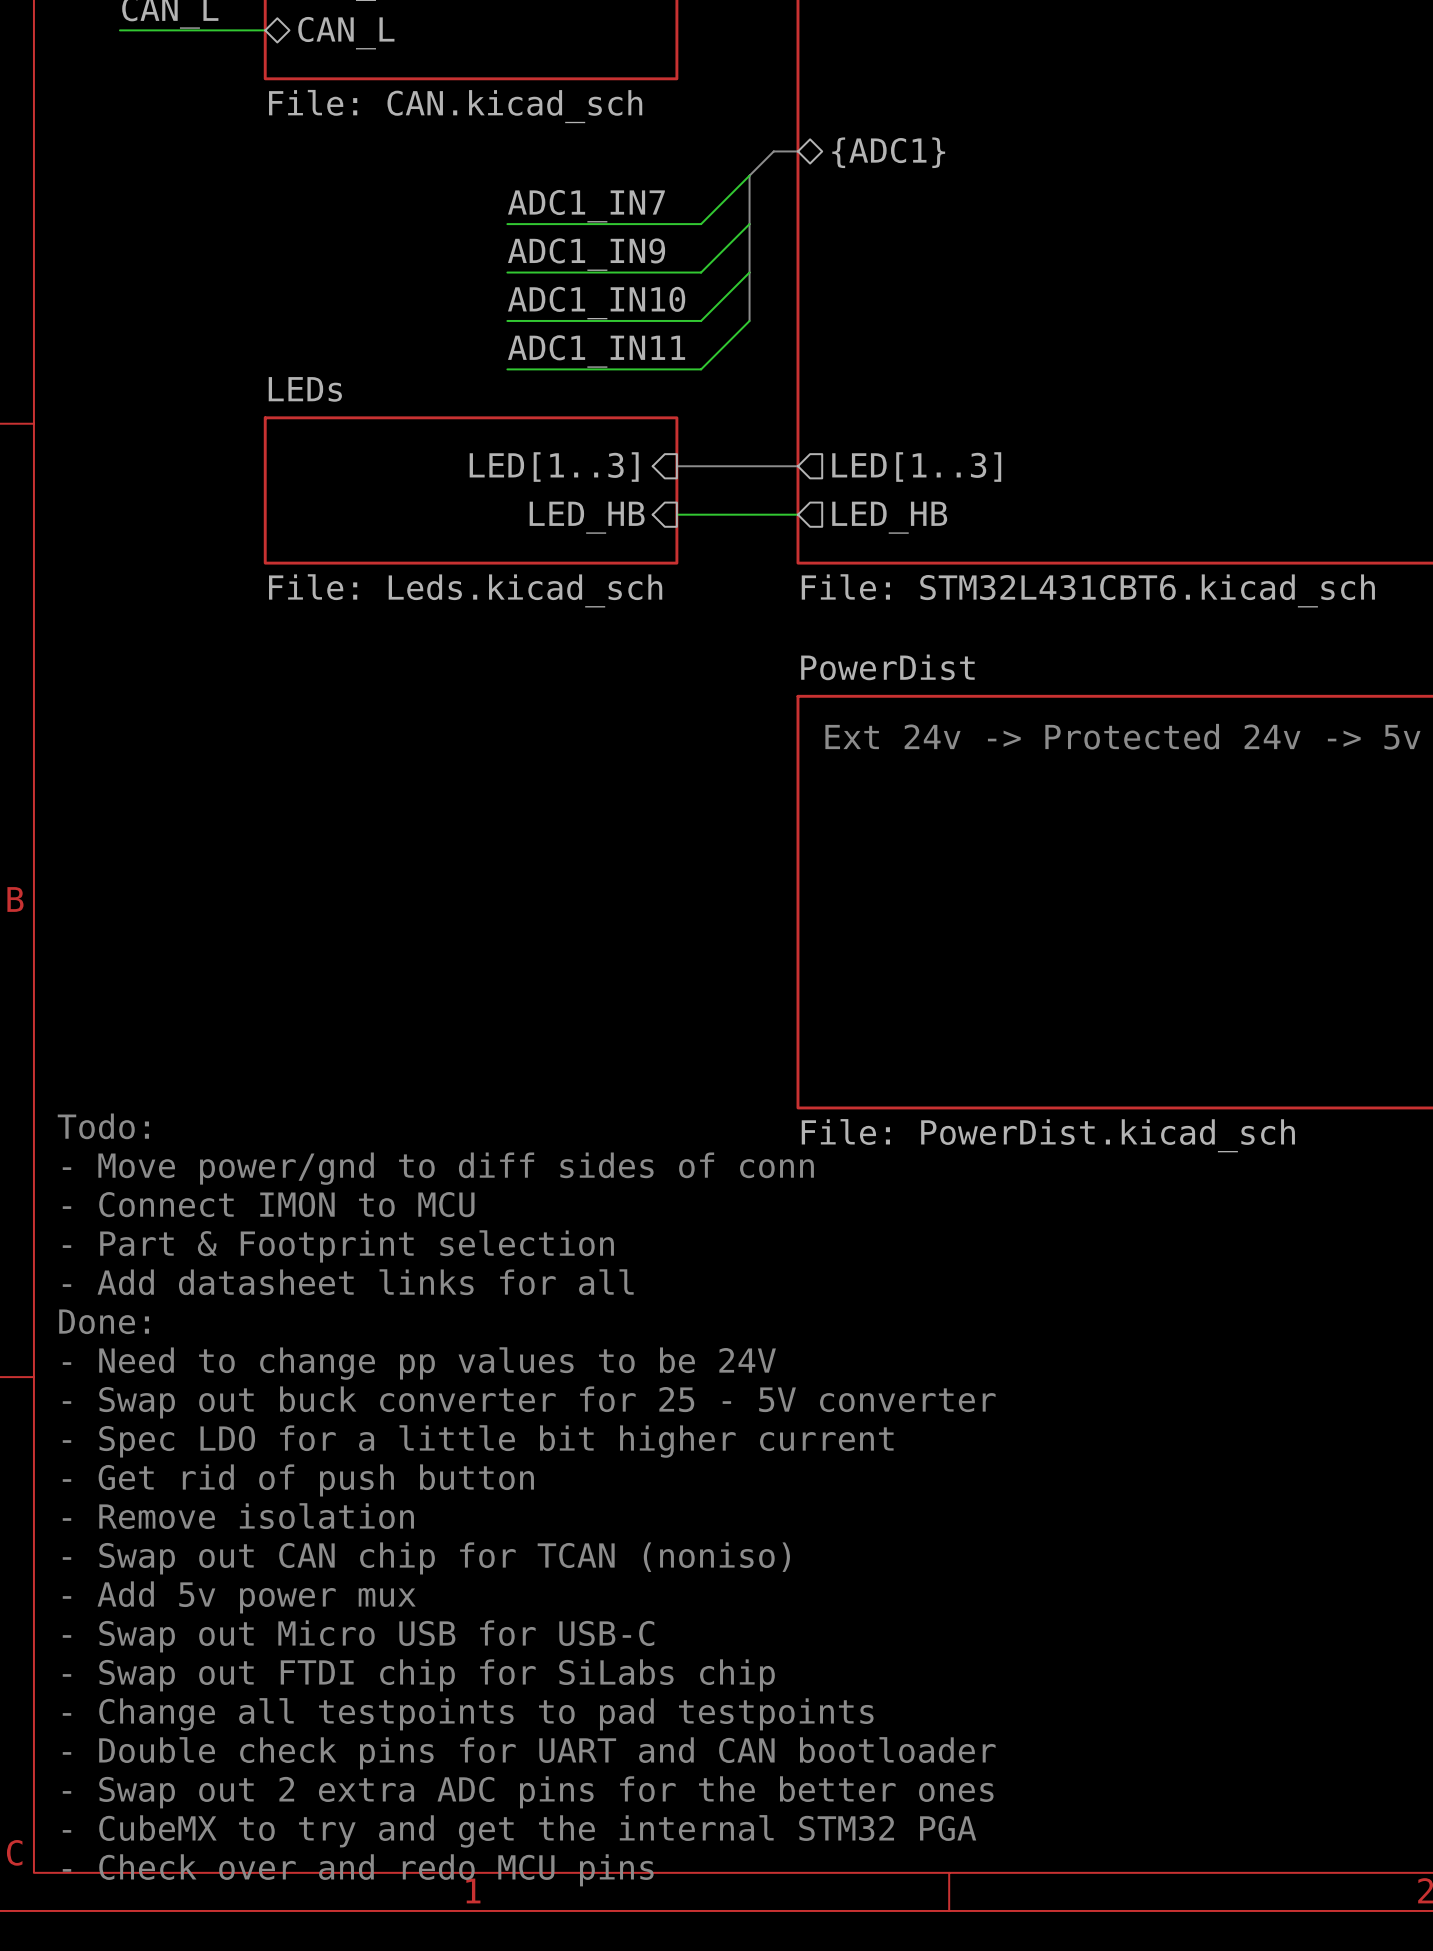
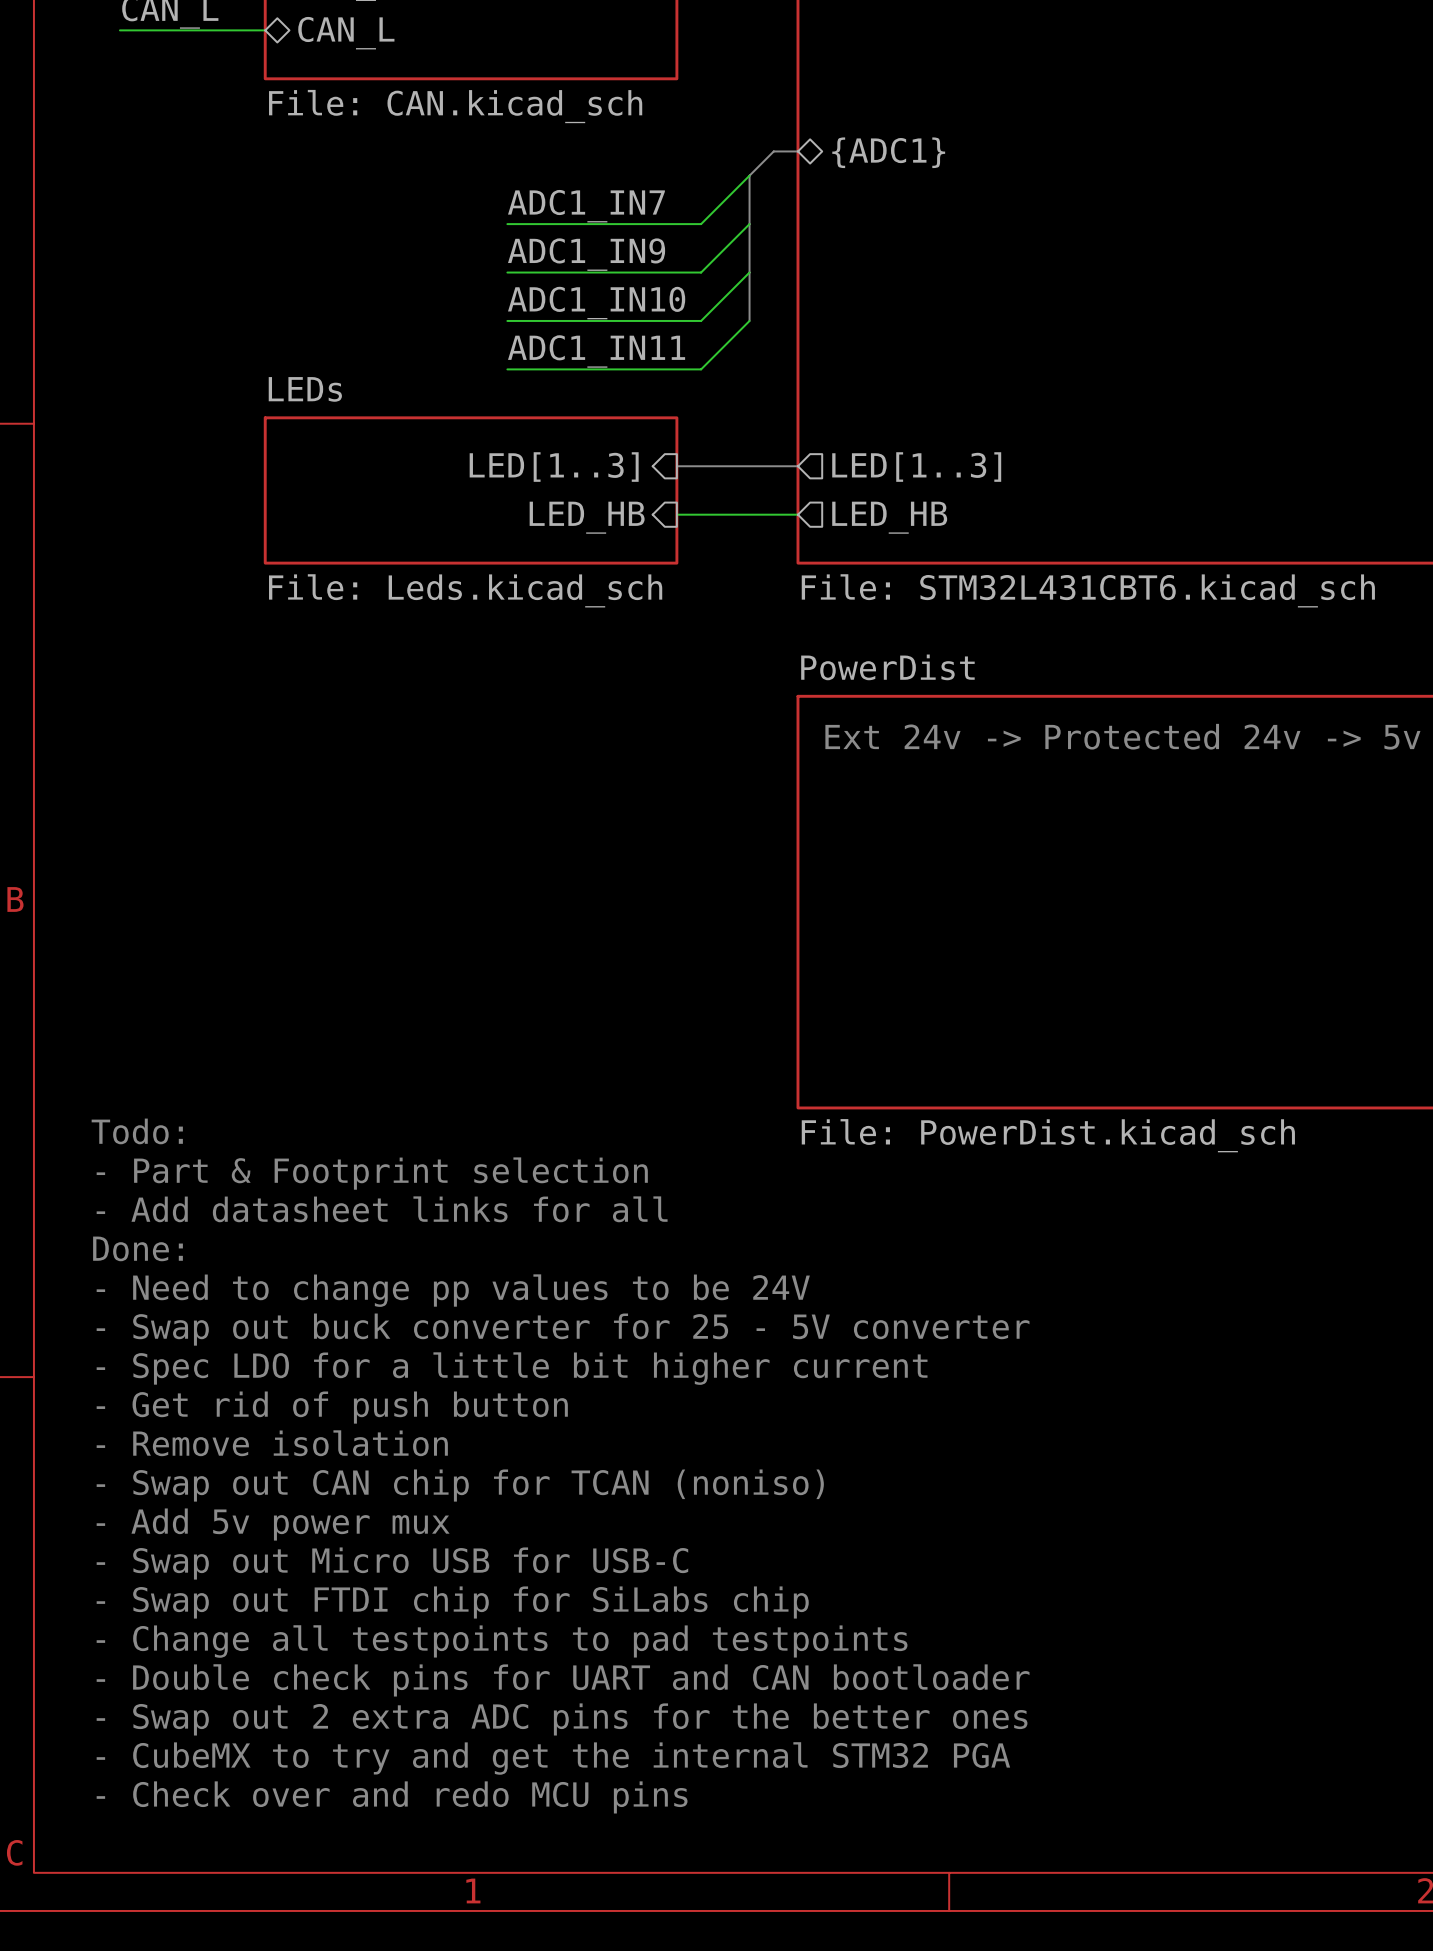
text position: Todo: (103, 1126) -> Todo: (137, 1131)
text: - Move power/gnd to diff sides of conn (438, 1168) -> none
text: - Connect IMON to MCU (268, 1204) -> none
text position: - Part & Footprint selection (338, 1246) -> - Part & Footprint selection (372, 1173)
text position: - Add datasheet links for all (348, 1282) -> - Add datasheet links for all (382, 1209)
text position: Done: (104, 1321) -> Done: (138, 1248)
text position: - Need to change pp values to be 24V (419, 1363) -> - Need to change pp values to be 24V (453, 1290)
text position: - Swap out buck converter for 25 - 5V converter (529, 1402) -> - Swap out buck converter for 25 - 5V converter (563, 1329)
text position: - Spec LDO for a little bit higher current (478, 1441) -> - Spec LDO for a little bit higher current (512, 1368)
text position: - Get rid of push button (298, 1480) -> - Get rid of push button (332, 1407)
text position: - Remove isolation (238, 1516) -> - Remove isolation (272, 1443)
text position: - Swap out CAN chip for TCAN (noniso) (426, 1558) -> - Swap out CAN chip for TCAN (noniso) (460, 1485)
text position: - Add 5v power mux (239, 1597) -> - Add 5v power mux (273, 1524)
text position: - Swap out Micro USB for USB-C (358, 1636) -> - Swap out Micro USB for USB-C (392, 1563)
text position: - Swap out FTDI chip for SiLabs chip (418, 1675) -> - Swap out FTDI chip for SiLabs chip (452, 1602)
text position: - Change all testpoints to pad testpoints (468, 1714) -> - Change all testpoints to pad testpoints (502, 1641)
text position: - Double check pins for UART and CAN bootloader (529, 1753) -> - Double check pins for UART and CAN bootloader (563, 1680)
text position: - Swap out 2 extra ADC pins for the better ones (528, 1792) -> - Swap out 2 extra ADC pins for the better ones (562, 1719)
text position: - CubeMX to try and get the internal STM32 PGA (519, 1831) -> - CubeMX to try and get the internal STM32 PGA (553, 1758)
text position: - Check over and redo MCU pins (358, 1870) -> - Check over and redo MCU pins (392, 1797)

